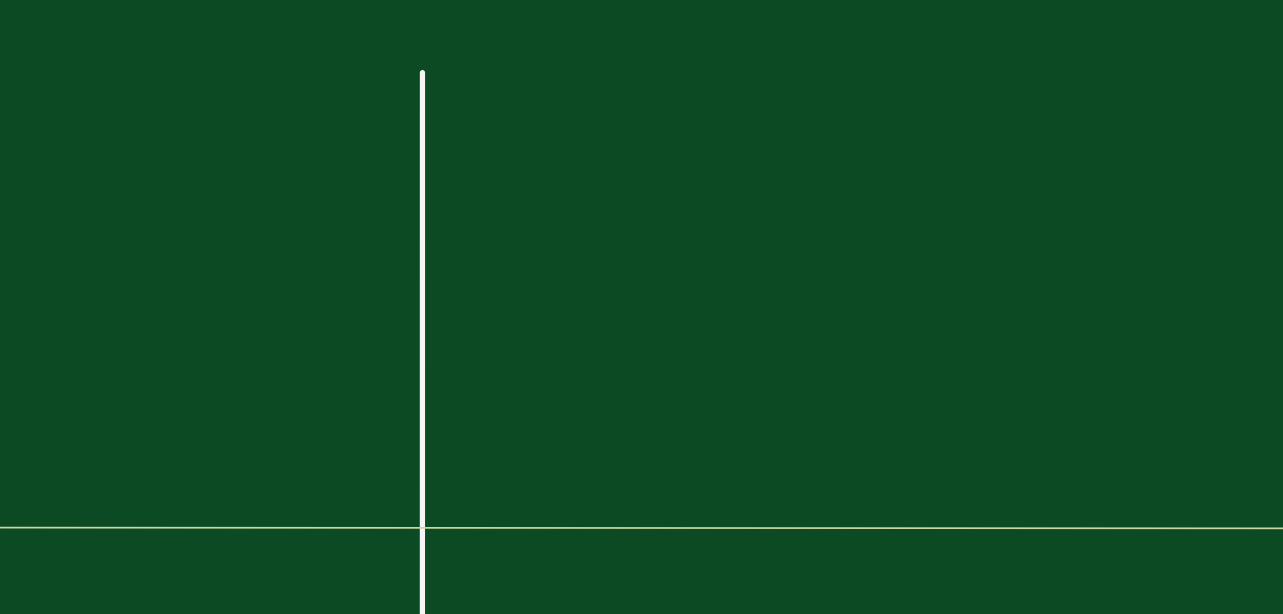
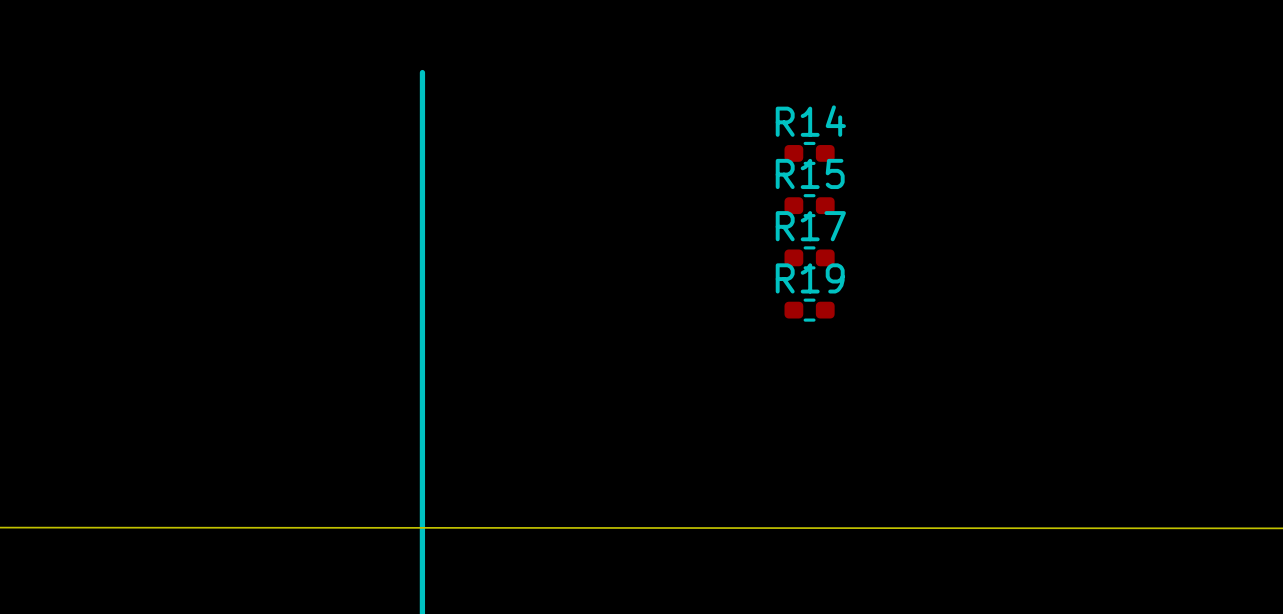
R14: none -> (809, 153)
R15: none -> (809, 205)
R17: none -> (809, 257)
R19: none -> (809, 310)

